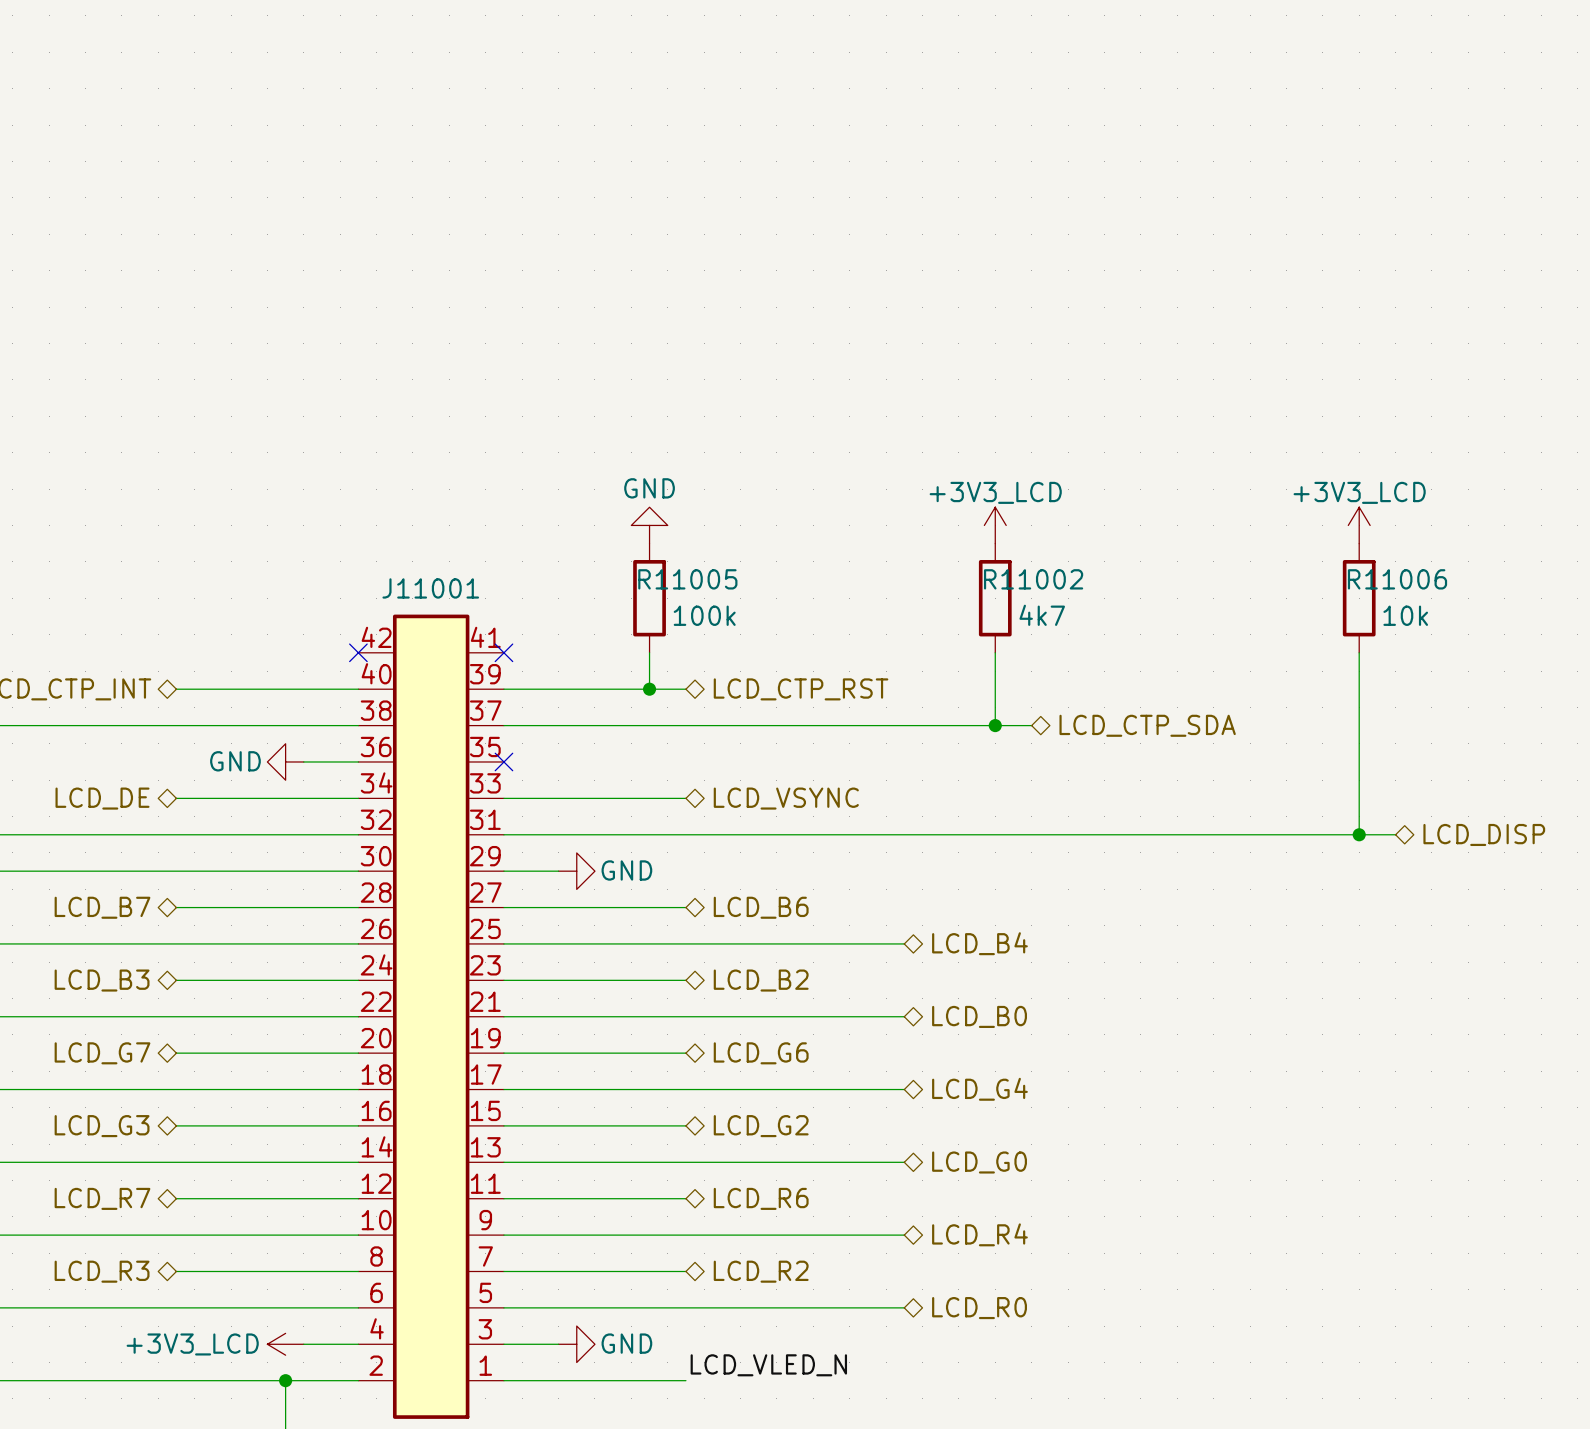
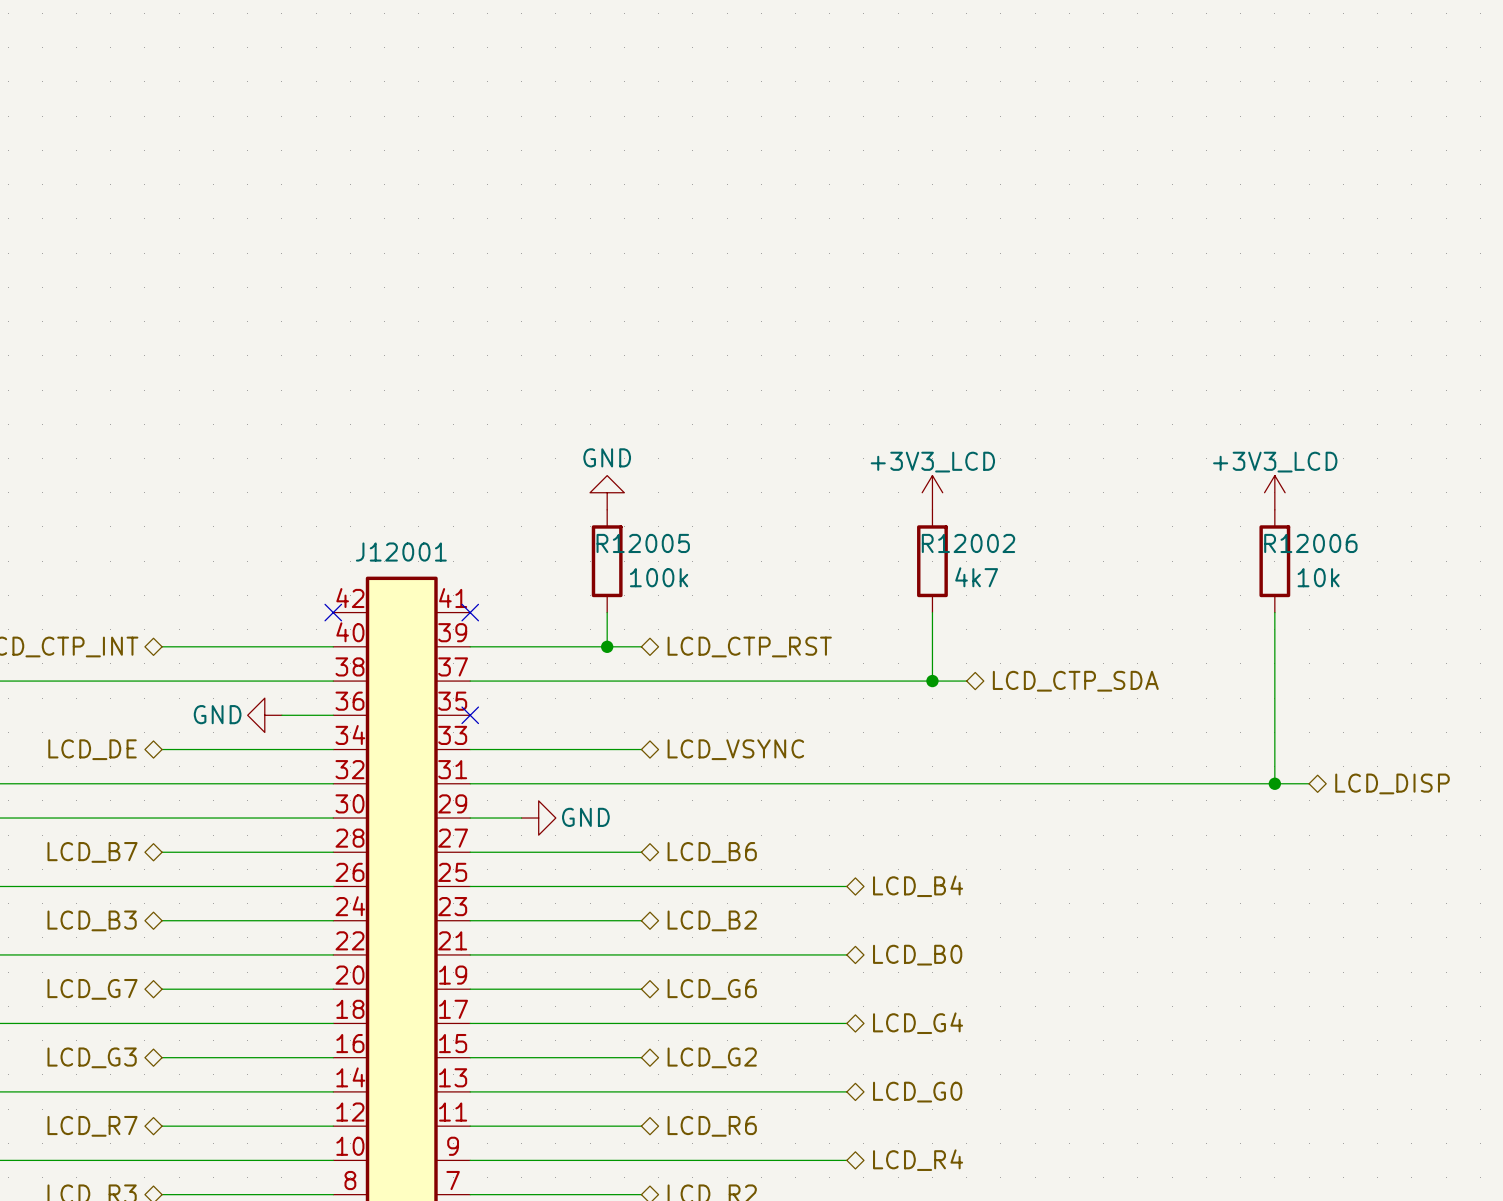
R11005 name: R11005 (687, 579) -> R12005 (643, 543)
R11002 name: R11002 (1033, 579) -> R12002 (968, 543)
R11006 name: R11006 (1397, 579) -> R12006 (1310, 543)
J11001 name: J11001 (430, 588) -> J12001 (401, 552)

